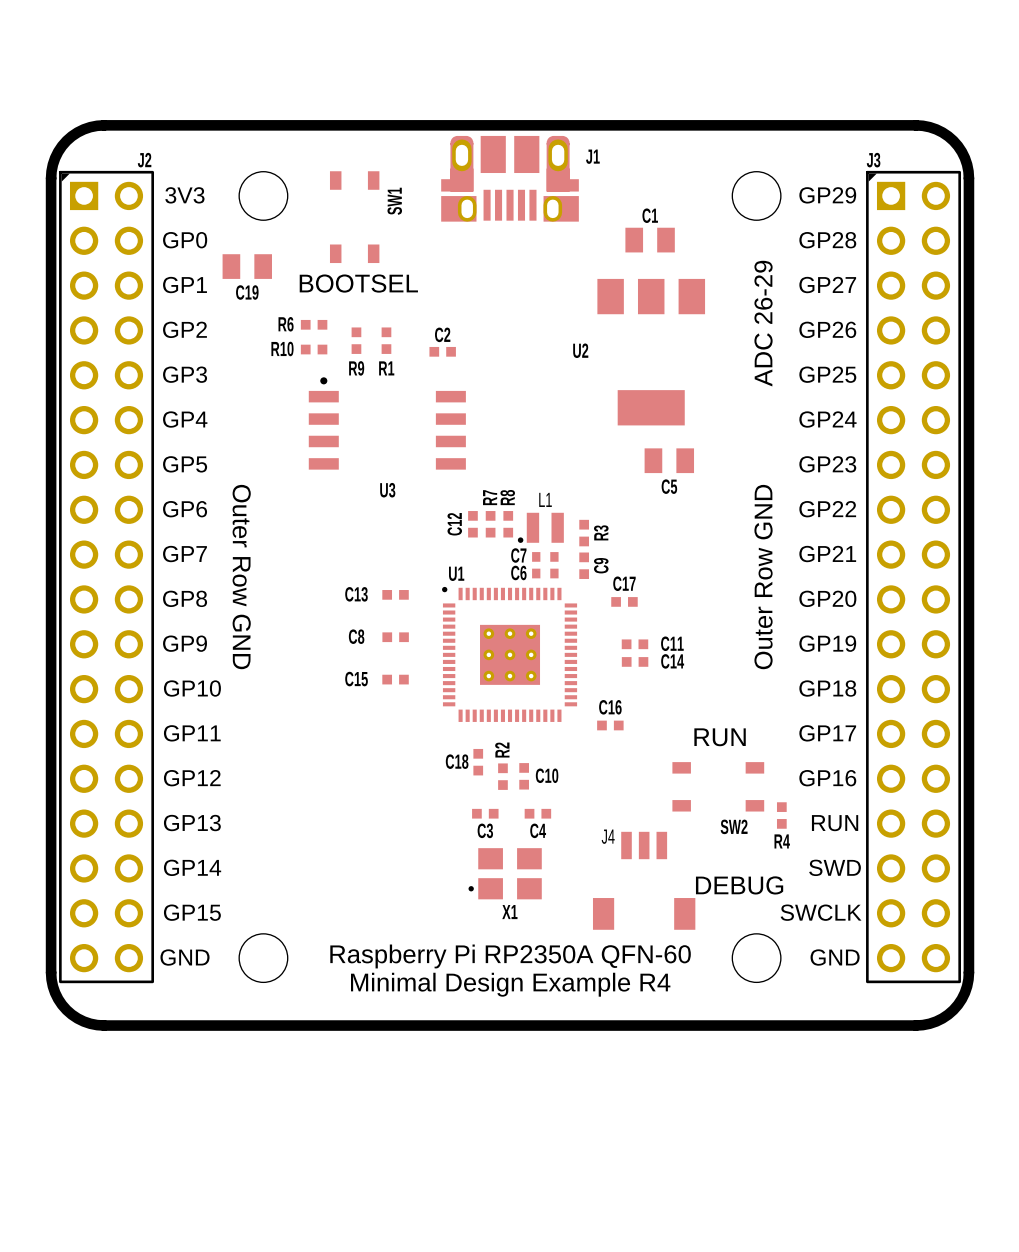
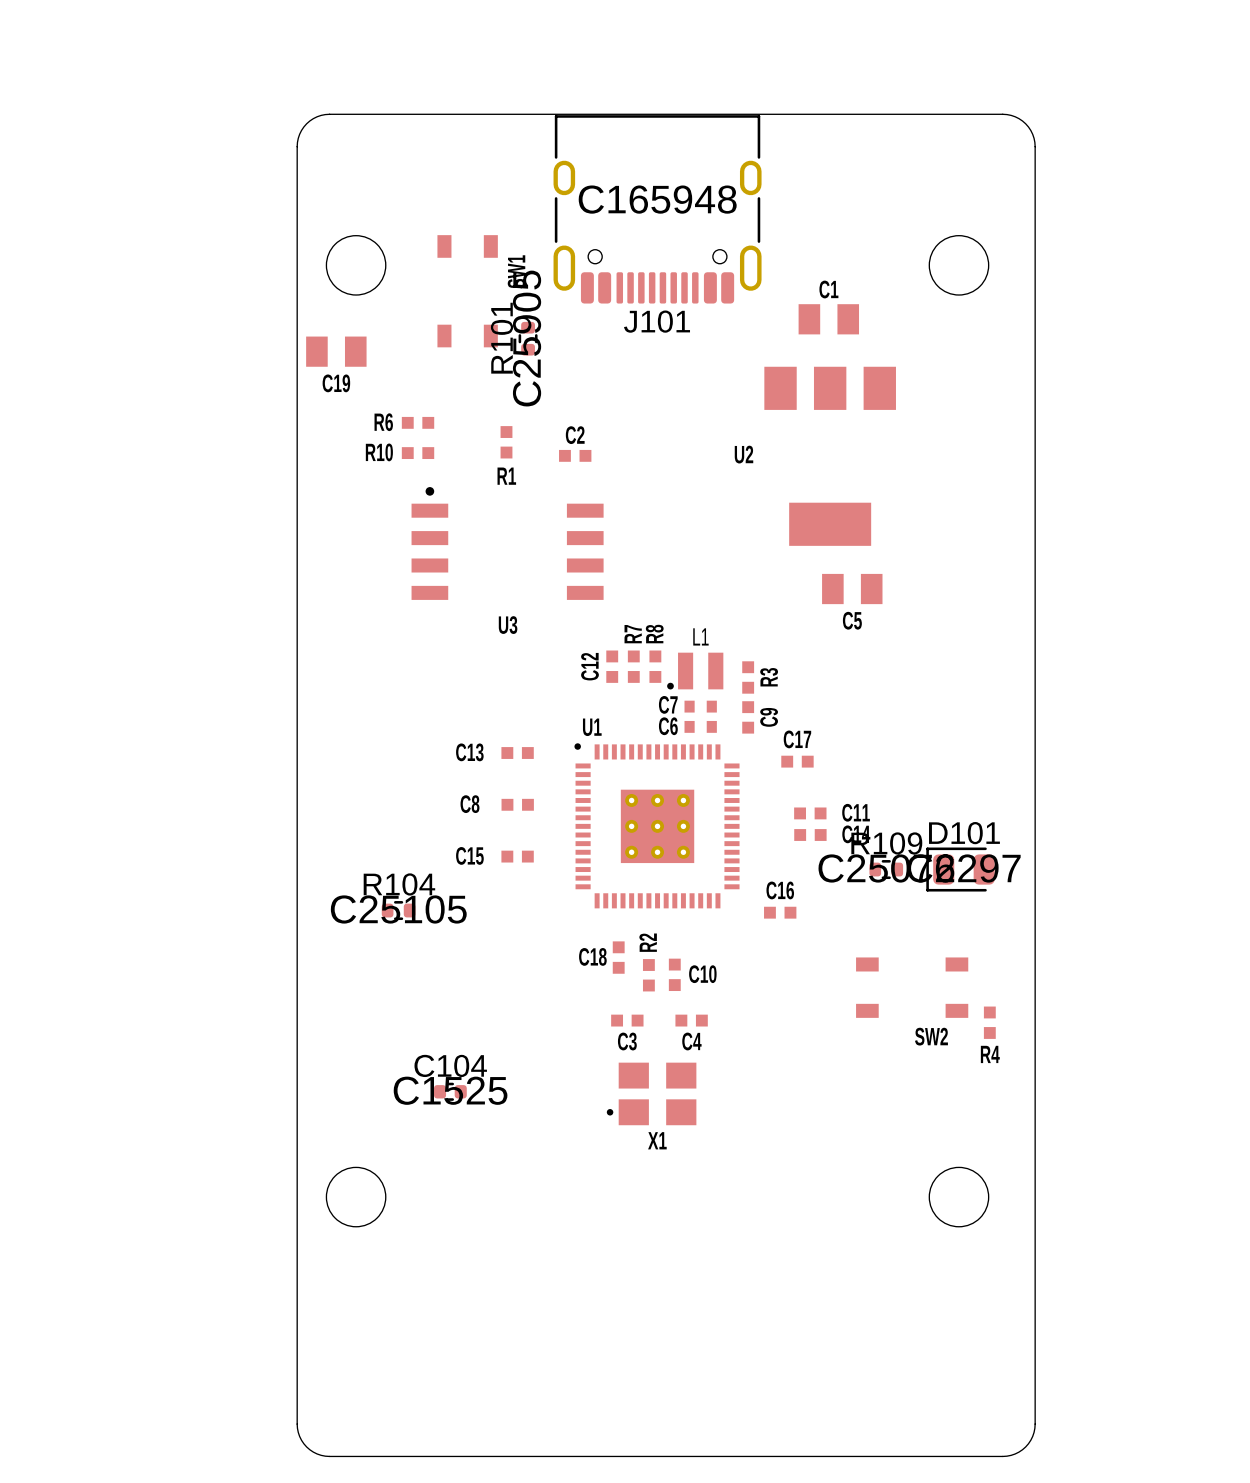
board edge: (104, 125) (915, 125) (936, 129) (953, 140) (964, 158) (968, 178) (968, 972) (964, 992) (953, 1010) (936, 1021) (915, 1025) (104, 1025) (83, 1021) (66, 1010) (55, 992) (51, 972) (51, 178) (55, 158) (66, 140) (83, 129) (104, 125) -> (329, 114) (317, 116) (306, 123) (299, 134) (297, 146) (297, 1424) (301, 1440) (313, 1452) (329, 1456) (1002, 1456) (1018, 1452) (1030, 1440) (1035, 1424) (1035, 146) (1030, 130) (1018, 118) (1002, 114) (329, 114)
J101: none -> (657, 209)
J1: (510, 178) -> none
text: 3V3 (184, 195) -> none
text: GP29 (827, 195) -> none
text: GP0 (185, 240) -> none
text: GP28 (827, 240) -> none
R101: none -> (528, 338)
text: BOOTSEL (358, 283) -> none
text: GP1 (184, 285) -> none
text: GP27 (827, 285) -> none
text: ADC 26-29 (763, 323) -> none
text: GP2 (184, 329) -> none
text: GP26 (827, 329) -> none
R9: (356, 340) -> none
text: GP3 (185, 374) -> none
text: GP25 (827, 374) -> none
text: GP4 (185, 419) -> none
text: GP24 (827, 419) -> none
text: GP5 (185, 464) -> none
text: GP23 (827, 464) -> none
text: GP6 (185, 509) -> none
text: GP22 (827, 509) -> none
text: GP7 (184, 554) -> none
text: GP21 (827, 554) -> none
J2: (106, 577) -> none
text: Outer Row GND (241, 577) -> none
text: Outer Row GND (763, 577) -> none
J3: (913, 577) -> none
text: GP8 (185, 598) -> none
text: GP20 (827, 598) -> none
text: GP9 (185, 643) -> none
text: GP19 (827, 643) -> none
text: GP10 (192, 688) -> none
text: GP18 (827, 688) -> none
R109: none -> (886, 869)
D101: none -> (960, 869)
R104: none -> (398, 910)
text: GP11 (192, 733) -> none
text: GP17 (827, 733) -> none
text: RUN (720, 737) -> none
text: GP12 (192, 778) -> none
text: GP16 (827, 778) -> none
text: GP13 (192, 823) -> none
text: RUN (835, 823) -> none
text: GP14 (192, 867) -> none
text: SWD (835, 867) -> none
C104: none -> (450, 1091)
J4: (644, 880) -> none
text: DEBUG (739, 885) -> none
text: GP15 (192, 912) -> none
text: SWCLK (821, 912) -> none
text: Raspberry Pi RP2350A QFN-60 (510, 956) -> none
text: GND (185, 957) -> none
text: GND (835, 957) -> none
text: Minimal Design Example R4 (510, 984) -> none

